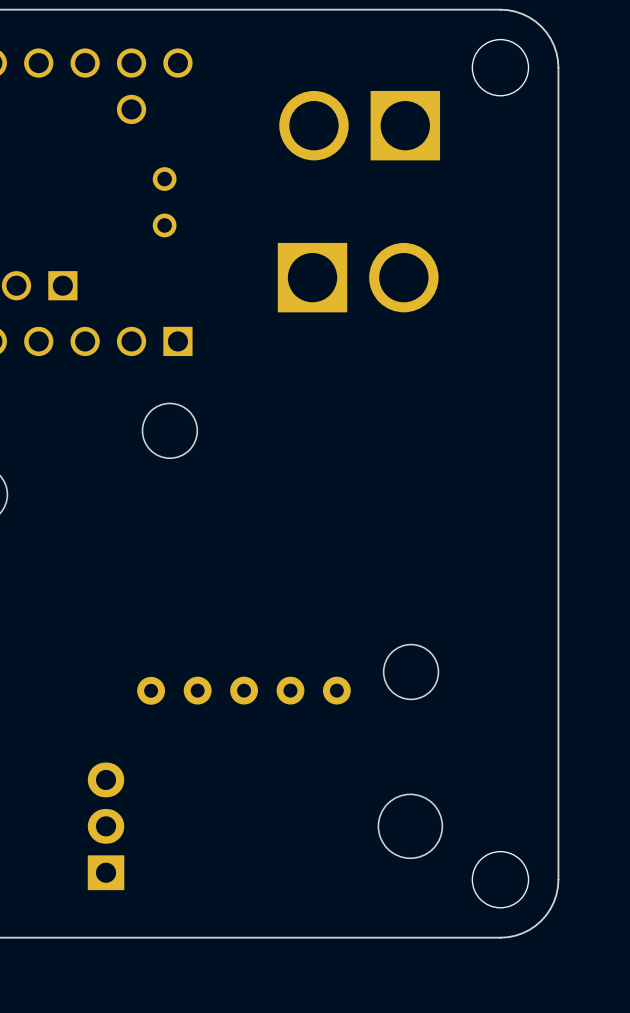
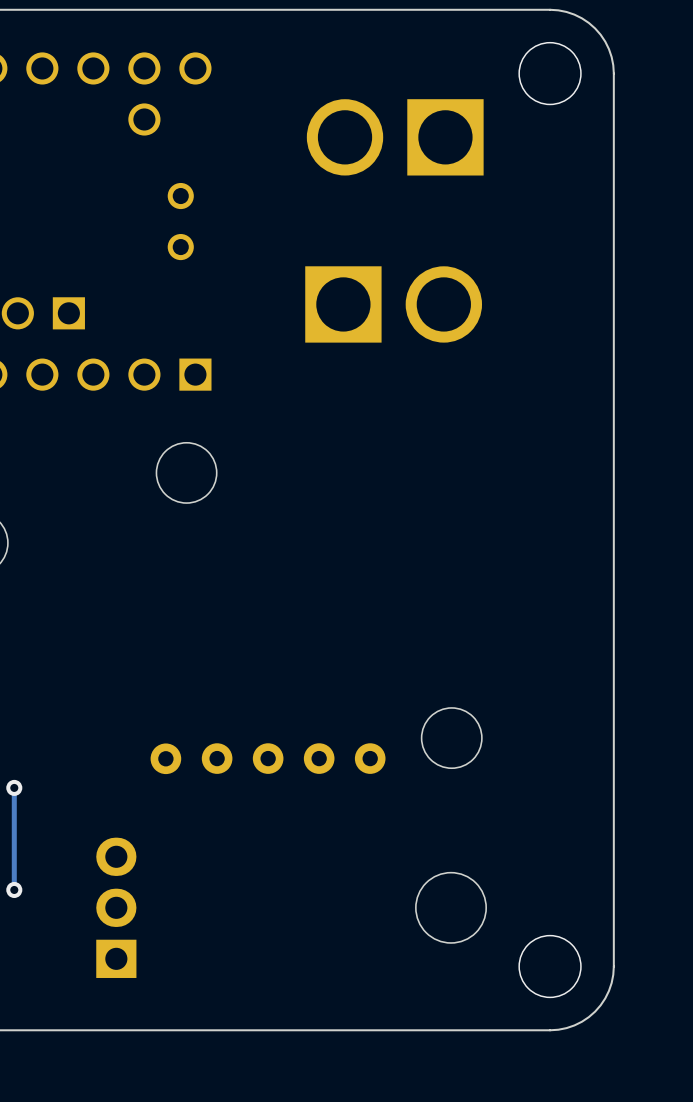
track: none -> (14, 787) (14, 889)
via: none -> (14, 787)
via: none -> (14, 889)

